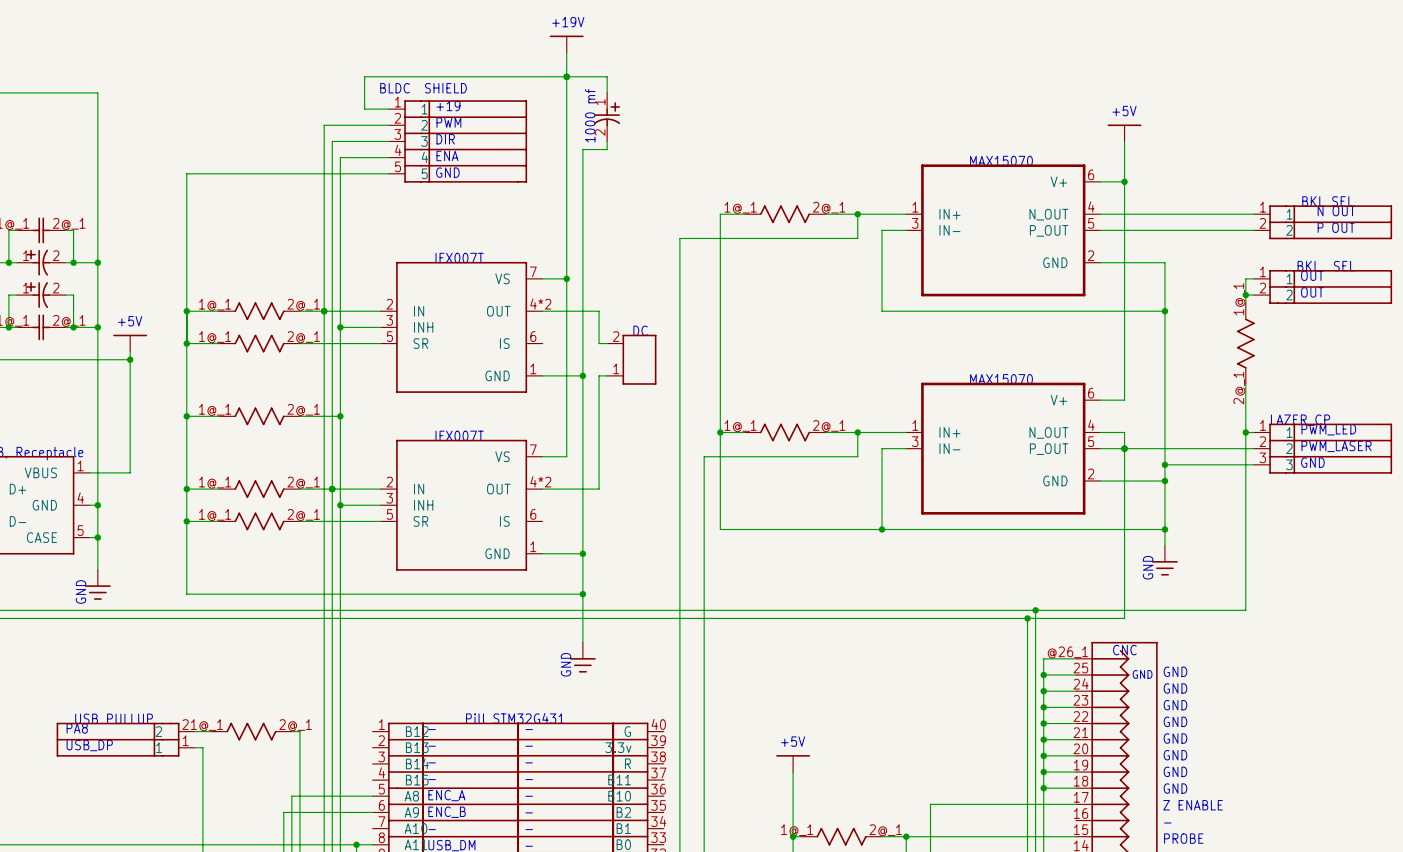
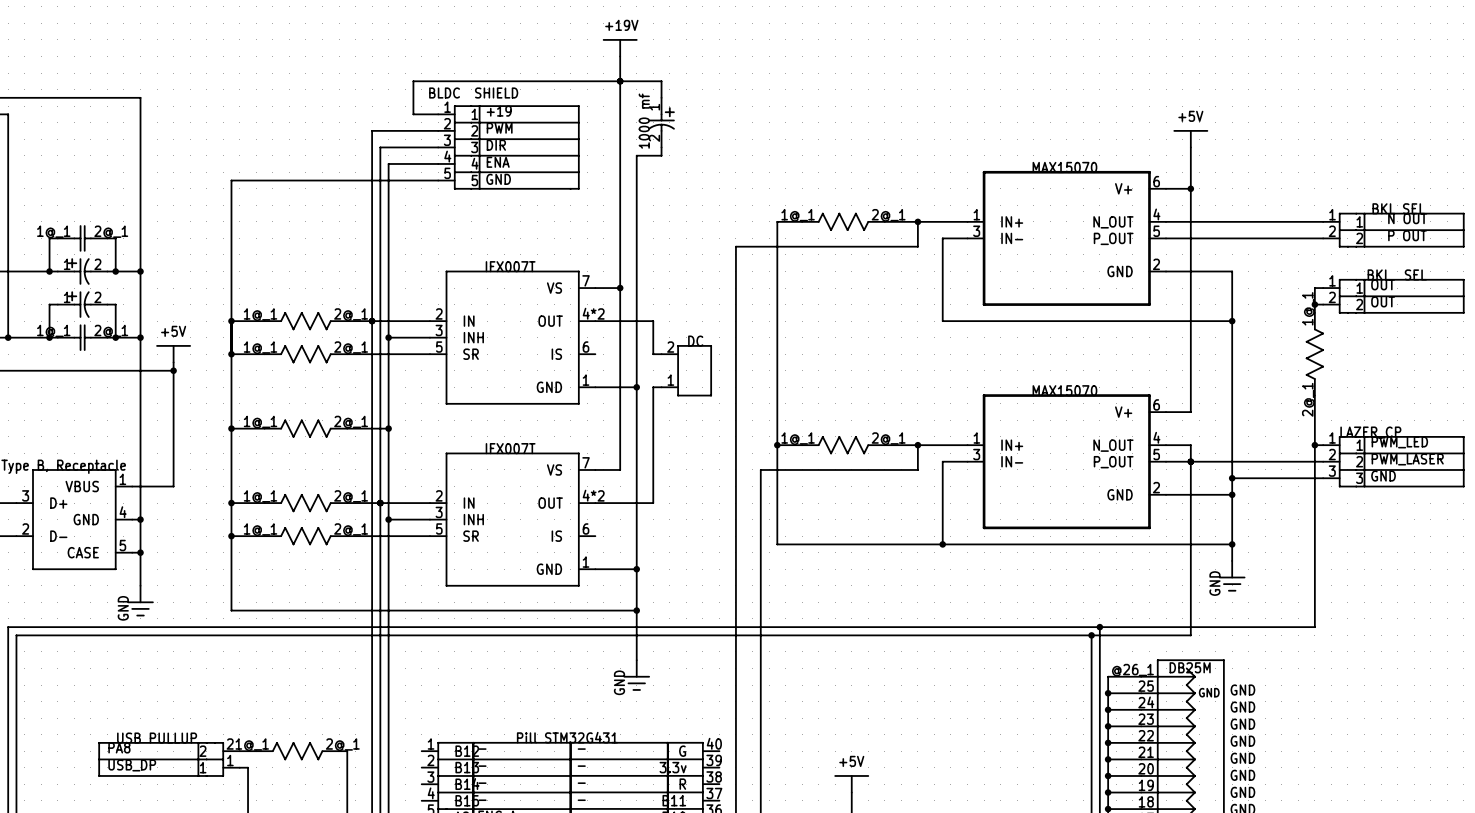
text: none -> DB25M (1190, 667)
text: CNC (1124, 650) -> none

